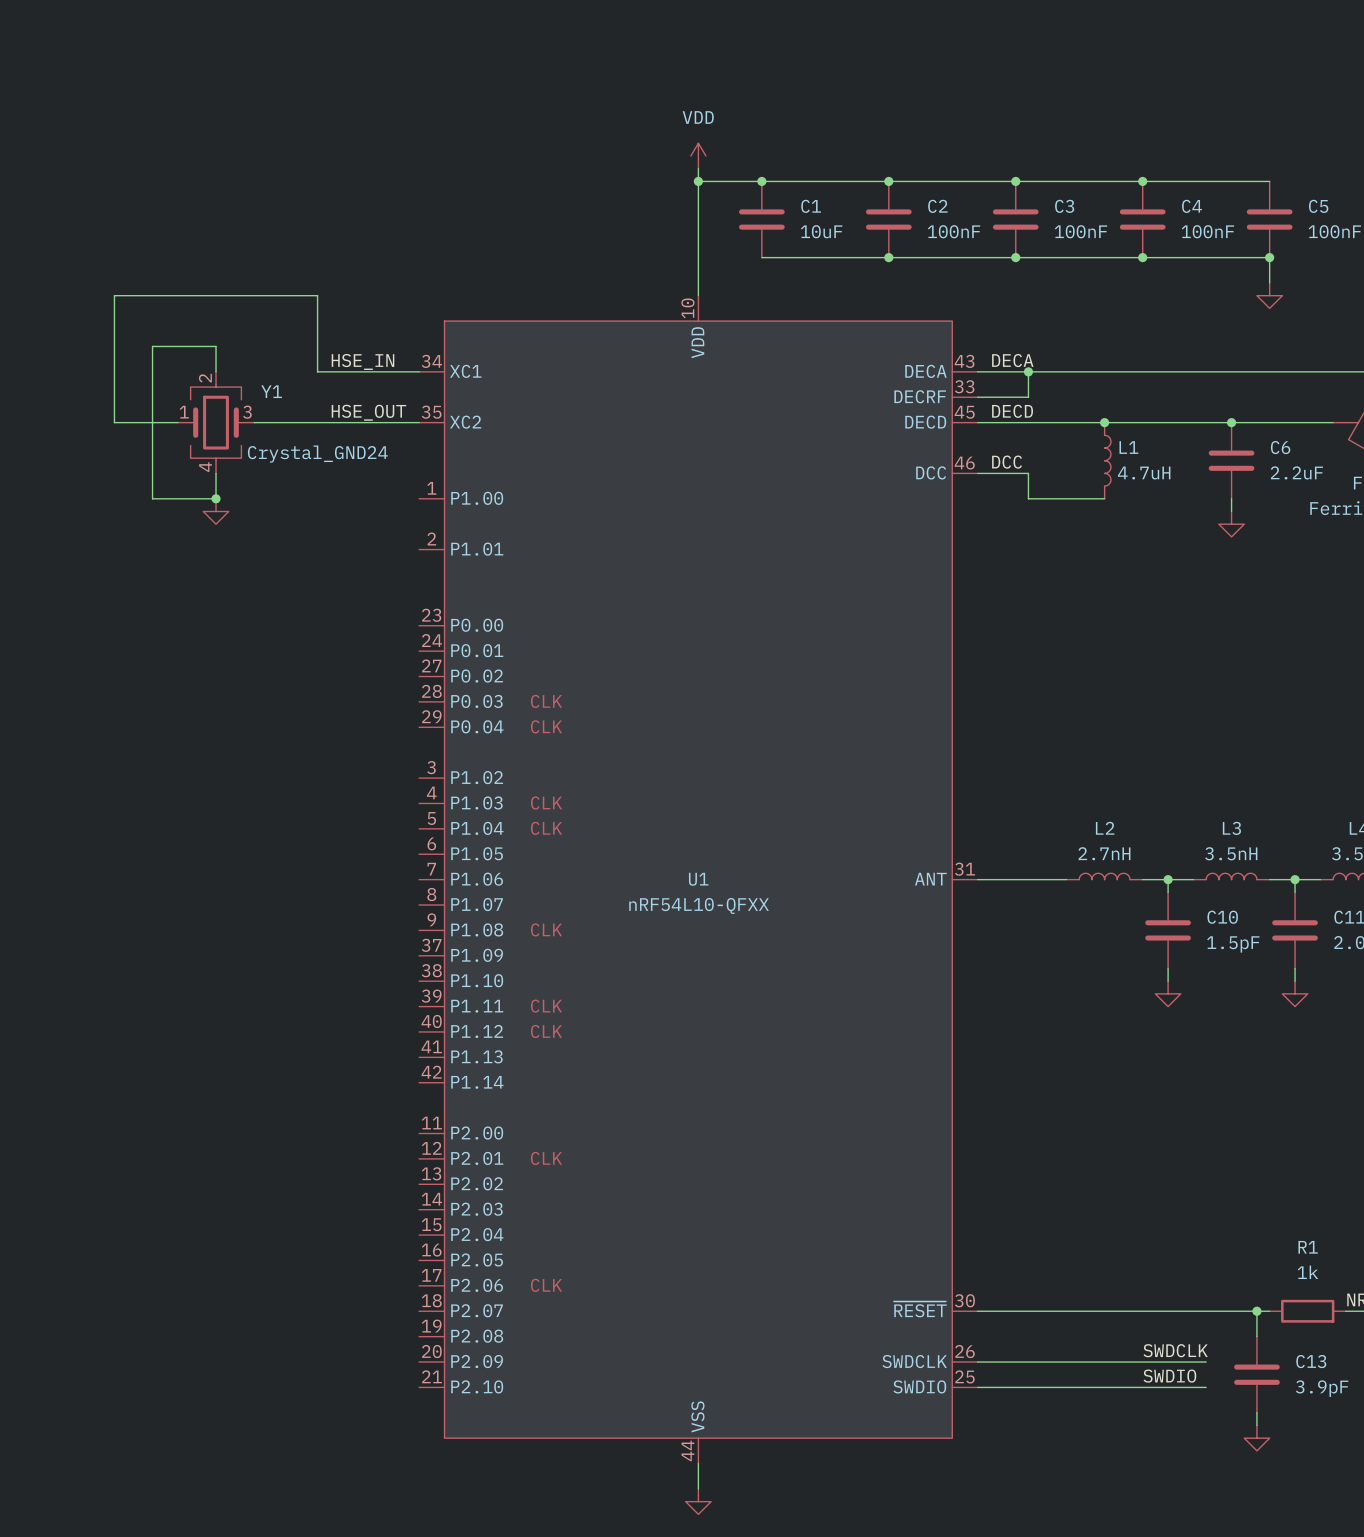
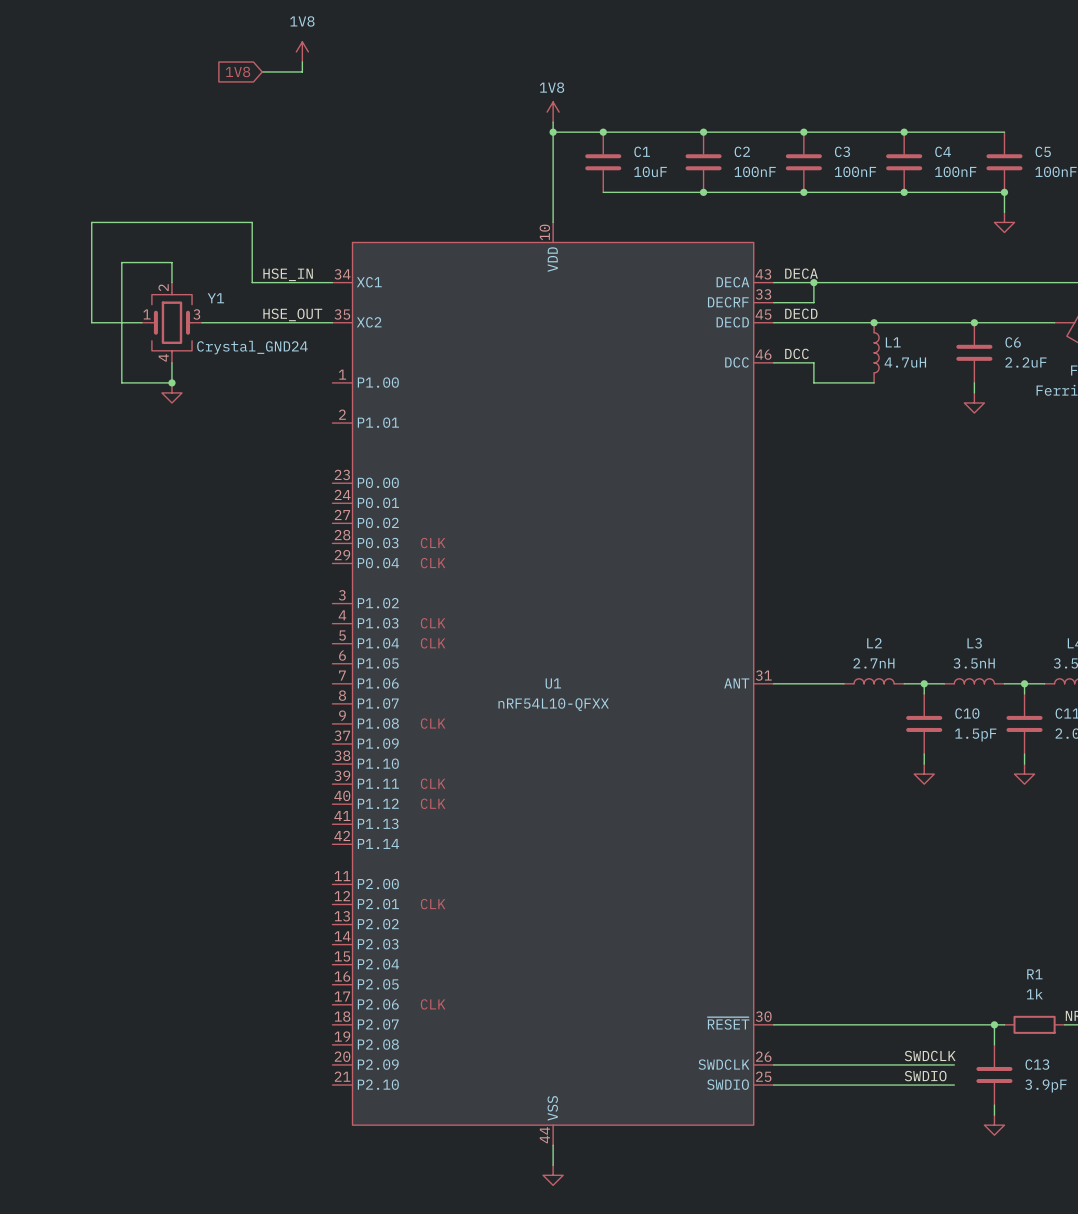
power symbol: none -> 1V8 (302, 51)
wire: none -> (302, 61) (302, 71) (262, 71)
global label: none -> 1V8 (238, 71)
power symbol: VDD (698, 156) -> 1V8 (553, 112)

